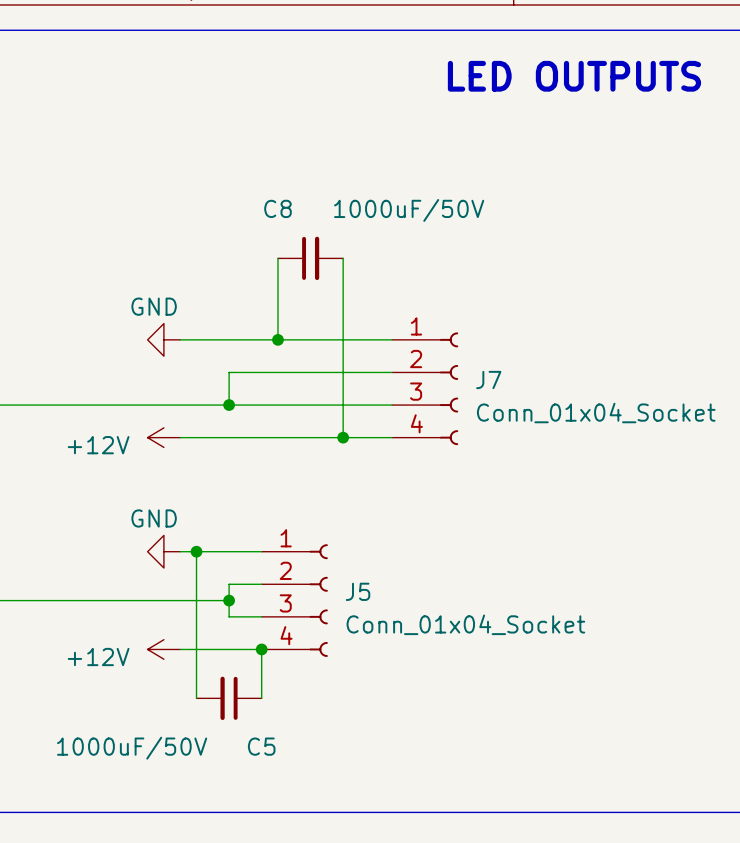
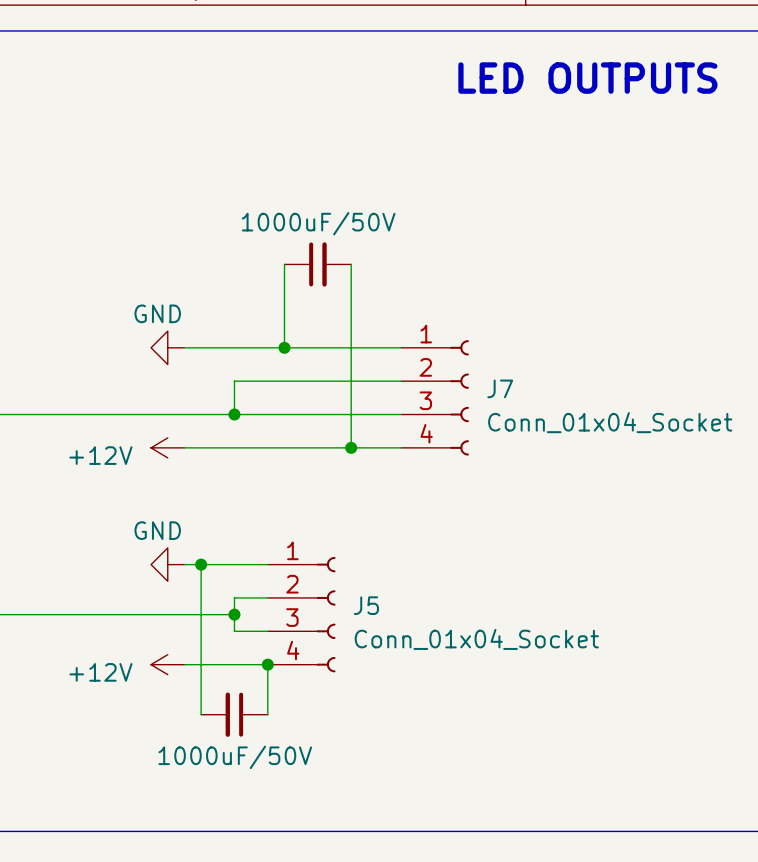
C8 name: C8 (277, 208) -> none
C8 value position: 1000uF/50V (409, 210) -> 1000uF/50V (318, 223)
C5 name: C5 (261, 746) -> none
C5 value position: 1000uF/50V (132, 748) -> 1000uF/50V (235, 757)

